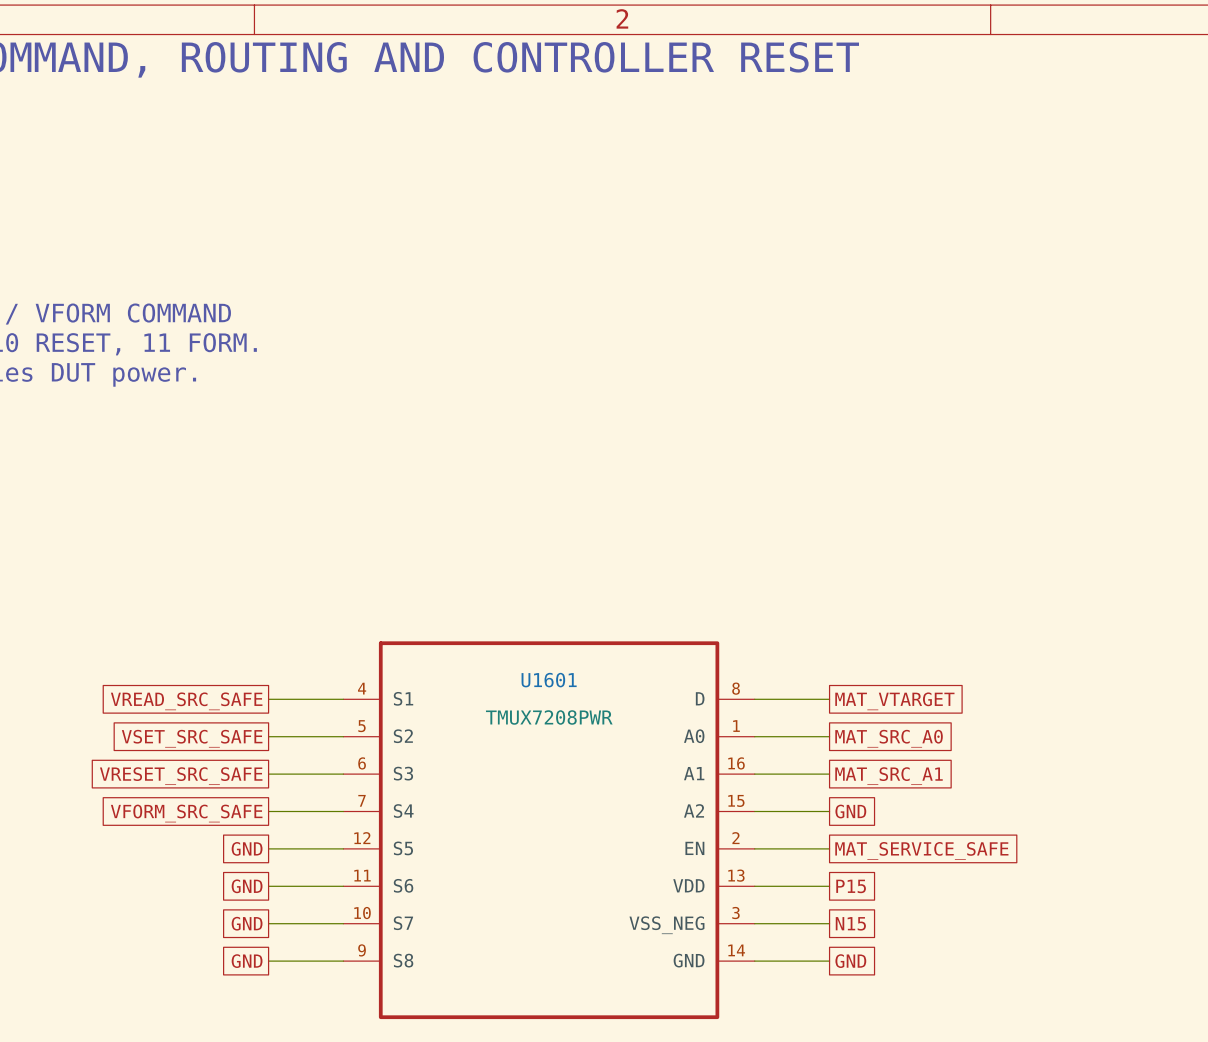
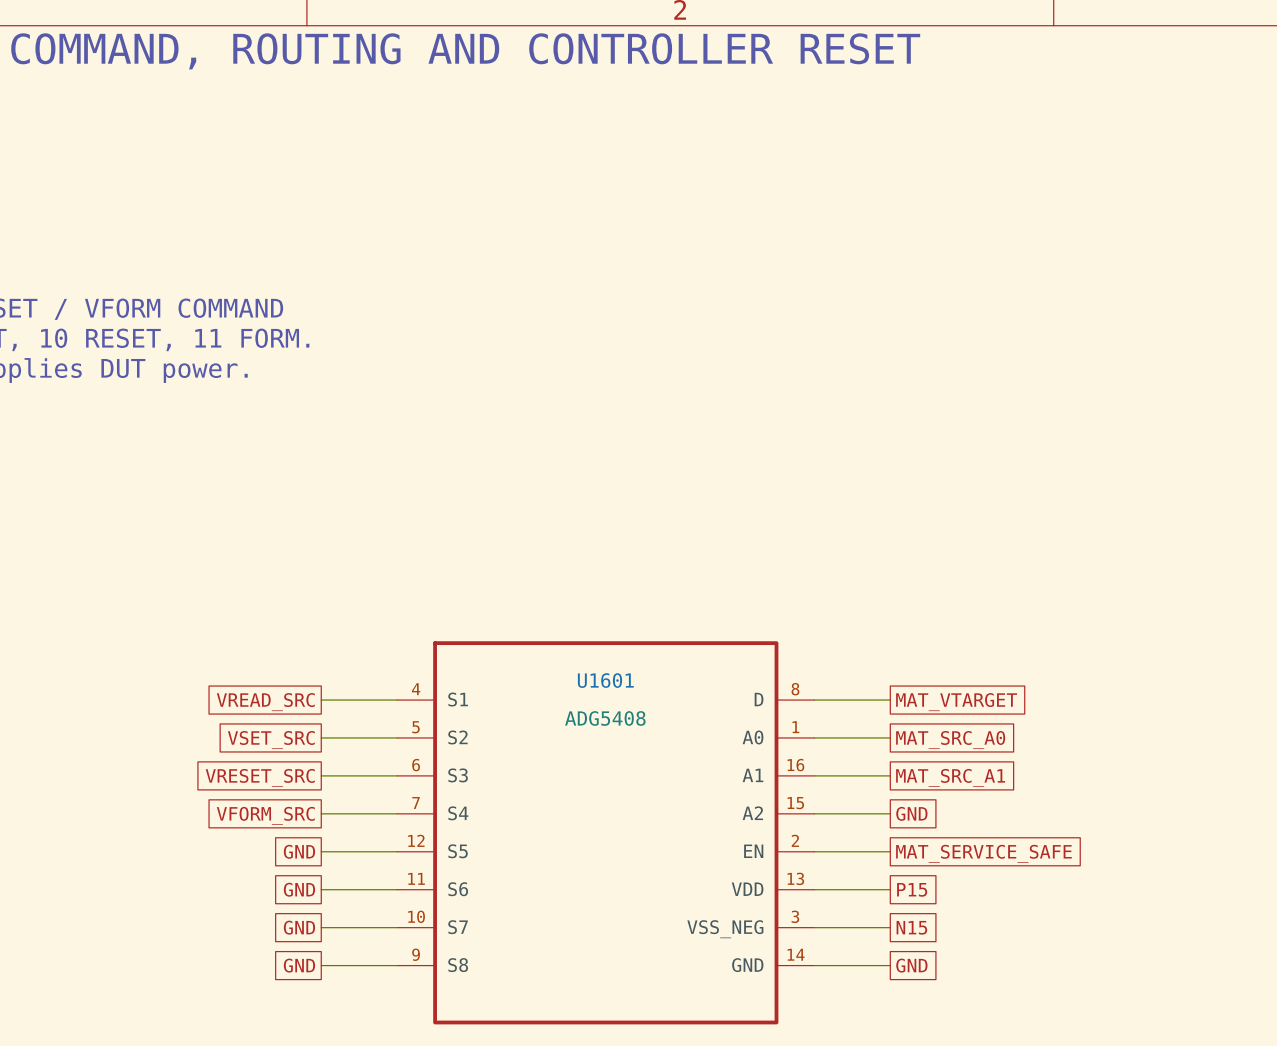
global label: VREAD_SRC_SAFE (186, 701) -> VREAD_SRC (265, 702)
U1601 value: TMUX7208PWR (549, 717) -> ADG5408 (605, 718)
global label: VSET_SRC_SAFE (192, 738) -> VSET_SRC (271, 740)
global label: VRESET_SRC_SAFE (181, 776) -> VRESET_SRC (260, 777)
global label: VFORM_SRC_SAFE (186, 813) -> VFORM_SRC (265, 815)

